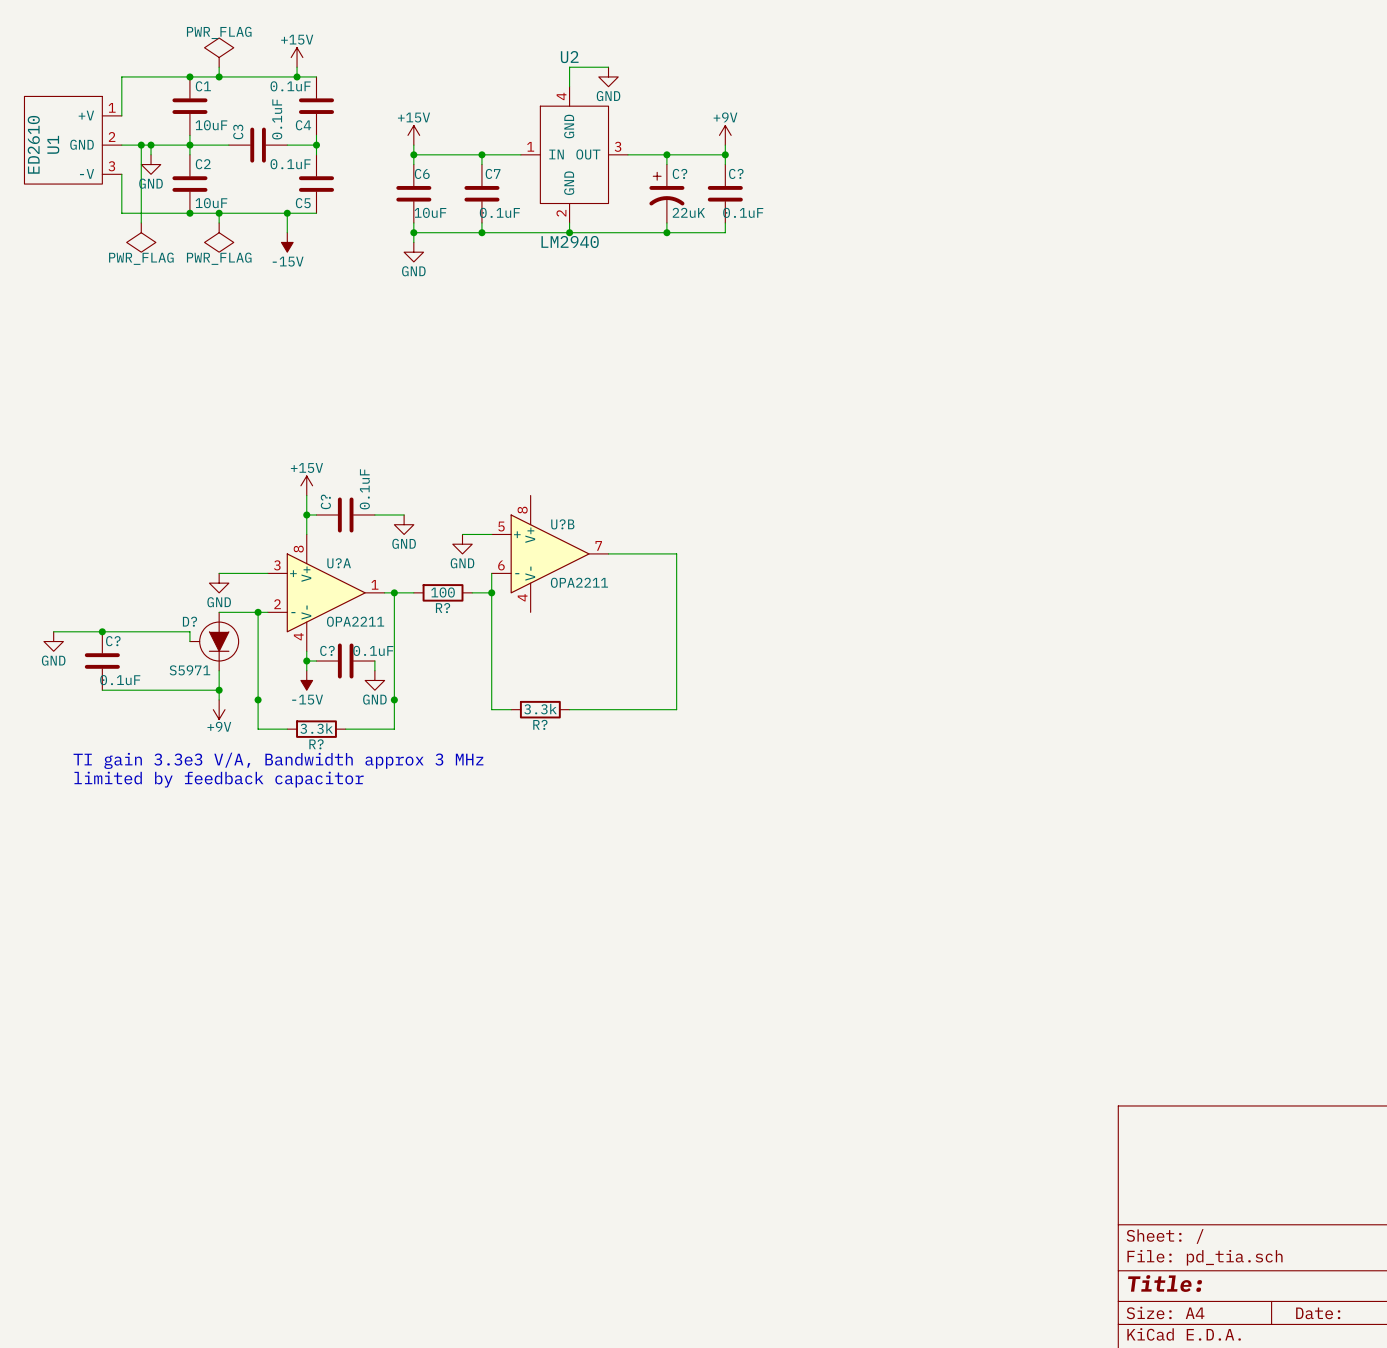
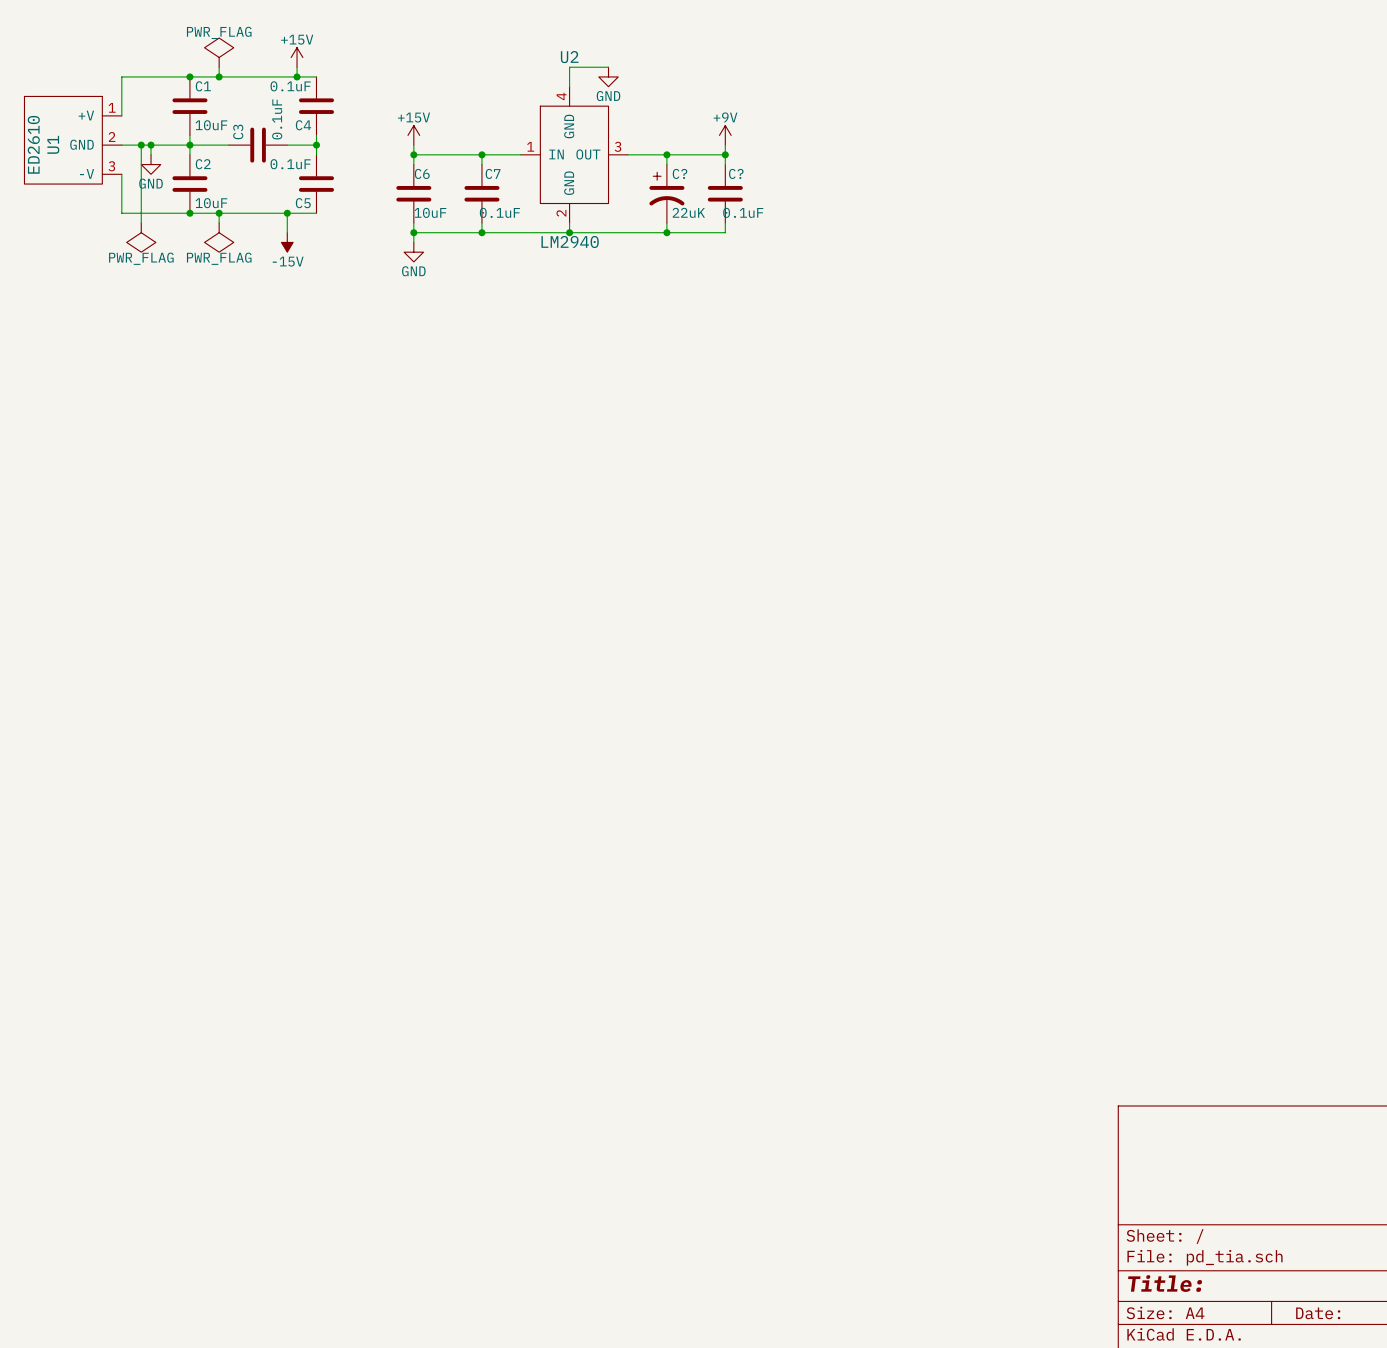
power symbol: +15V (306, 485) -> none
wire: (306, 495) (306, 534) -> none
wire: (306, 514) (316, 514) -> none
junction: (306, 514) -> none
C?: 0.1uF (345, 514) -> none
wire: (374, 514) (404, 514) -> none
power symbol: GND (404, 524) -> none
wire: (462, 534) (491, 534) -> none
power symbol: GND (462, 544) -> none
U?B: OPA2211 (550, 553) -> none
wire: (608, 553) (676, 553) (676, 709) (569, 709) -> none
wire: (219, 573) (267, 573) -> none
wire: (491, 573) (491, 709) (511, 709) -> none
power symbol: GND (219, 583) -> none
U?A: OPA2211 (326, 592) -> none
wire: (384, 592) (413, 592) -> none
wire: (394, 592) (394, 729) (345, 729) -> none
junction: (394, 592) -> none
R?: 100 (443, 592) -> none
wire: (472, 592) (491, 592) -> none
junction: (491, 592) -> none
wire: (219, 612) (267, 612) -> none
wire: (258, 612) (258, 729) (287, 729) -> none
junction: (258, 612) -> none
wire: (53, 631) (189, 631) (189, 641) -> none
junction: (102, 631) -> none
power symbol: GND (53, 641) -> none
D?: S5971 (214, 641) -> none
wire: (306, 651) (306, 670) -> none
C?: 0.1uF (102, 661) -> none
wire: (306, 661) (316, 661) -> none
junction: (306, 661) -> none
C?: 0.1uF (345, 661) -> none
wire: (374, 661) (374, 670) -> none
wire: (219, 670) (219, 699) -> none
power symbol: -15V (306, 680) -> none
power symbol: GND (374, 680) -> none
wire: (102, 690) (219, 690) -> none
junction: (219, 690) -> none
junction: (258, 699) -> none
junction: (394, 699) -> none
power symbol: +9V (219, 709) -> none
R?: 3.3k (540, 709) -> none
R?: 3.3k (316, 729) -> none
text: TI gain 3.3e3 V/A, Bandwidth approx 3 MHz (278, 760) -> none
text: limited by feedback capacitor (219, 779) -> none

